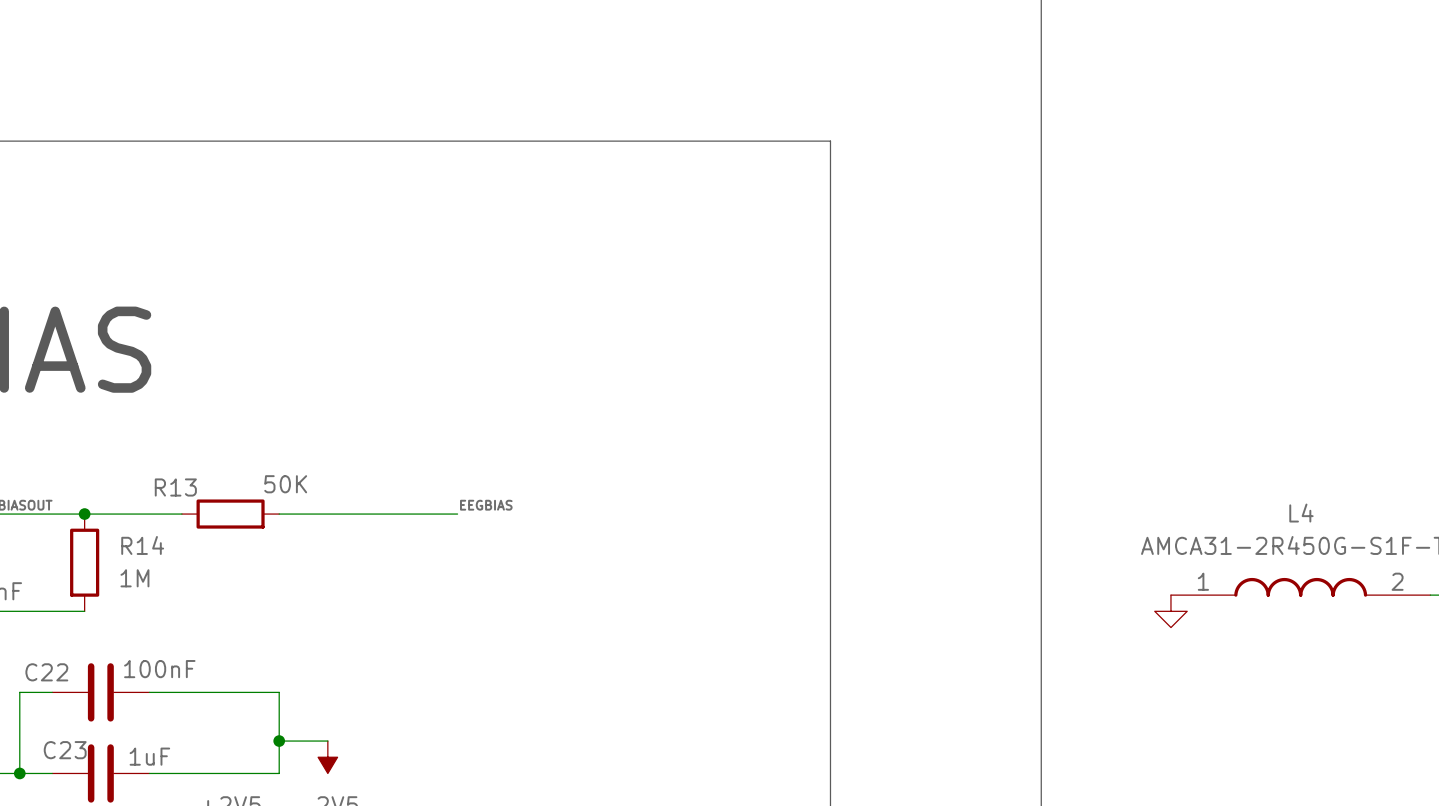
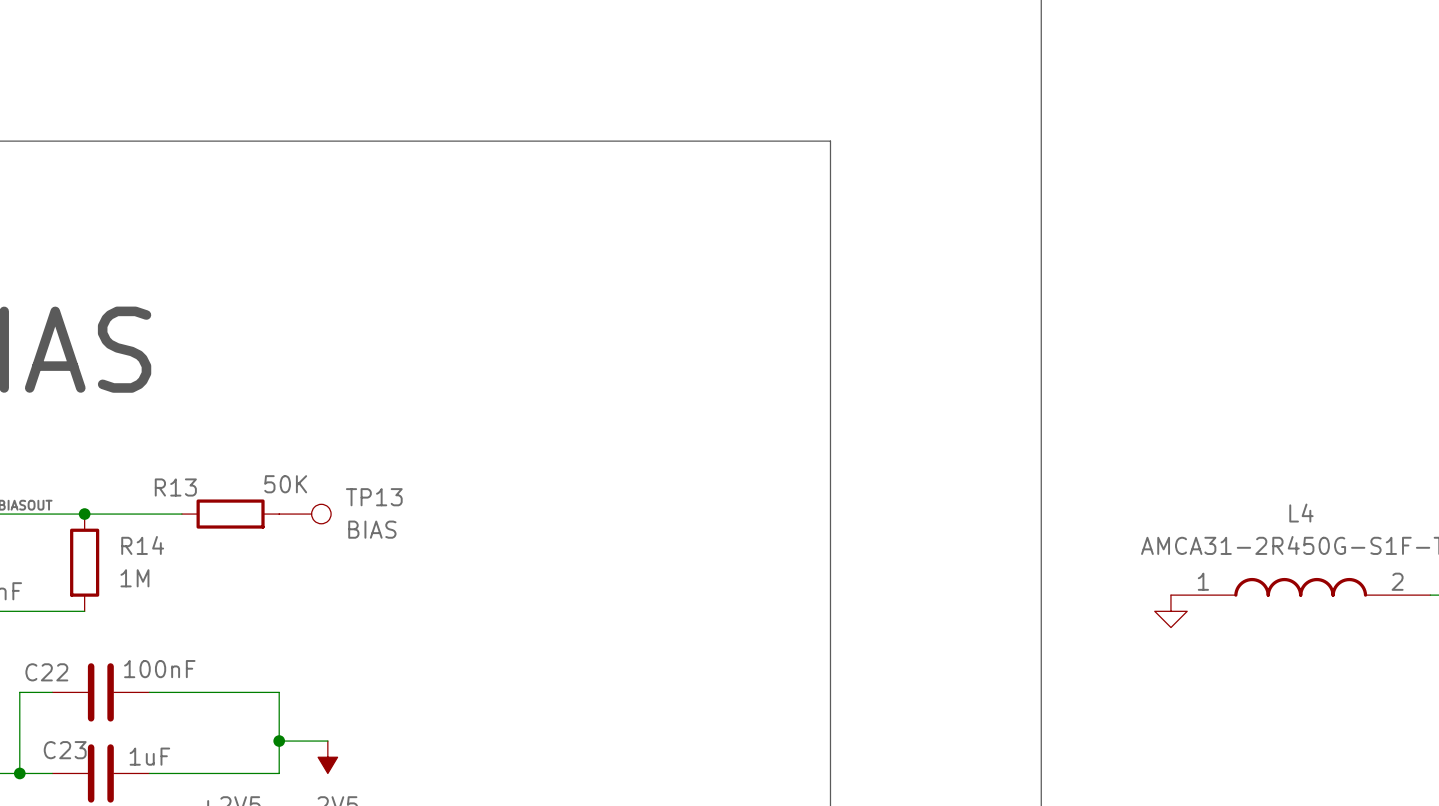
label: EEGBIAS (486, 505) -> none
wire: (279, 514) (457, 514) -> none
TP13: none -> BIAS (305, 514)

